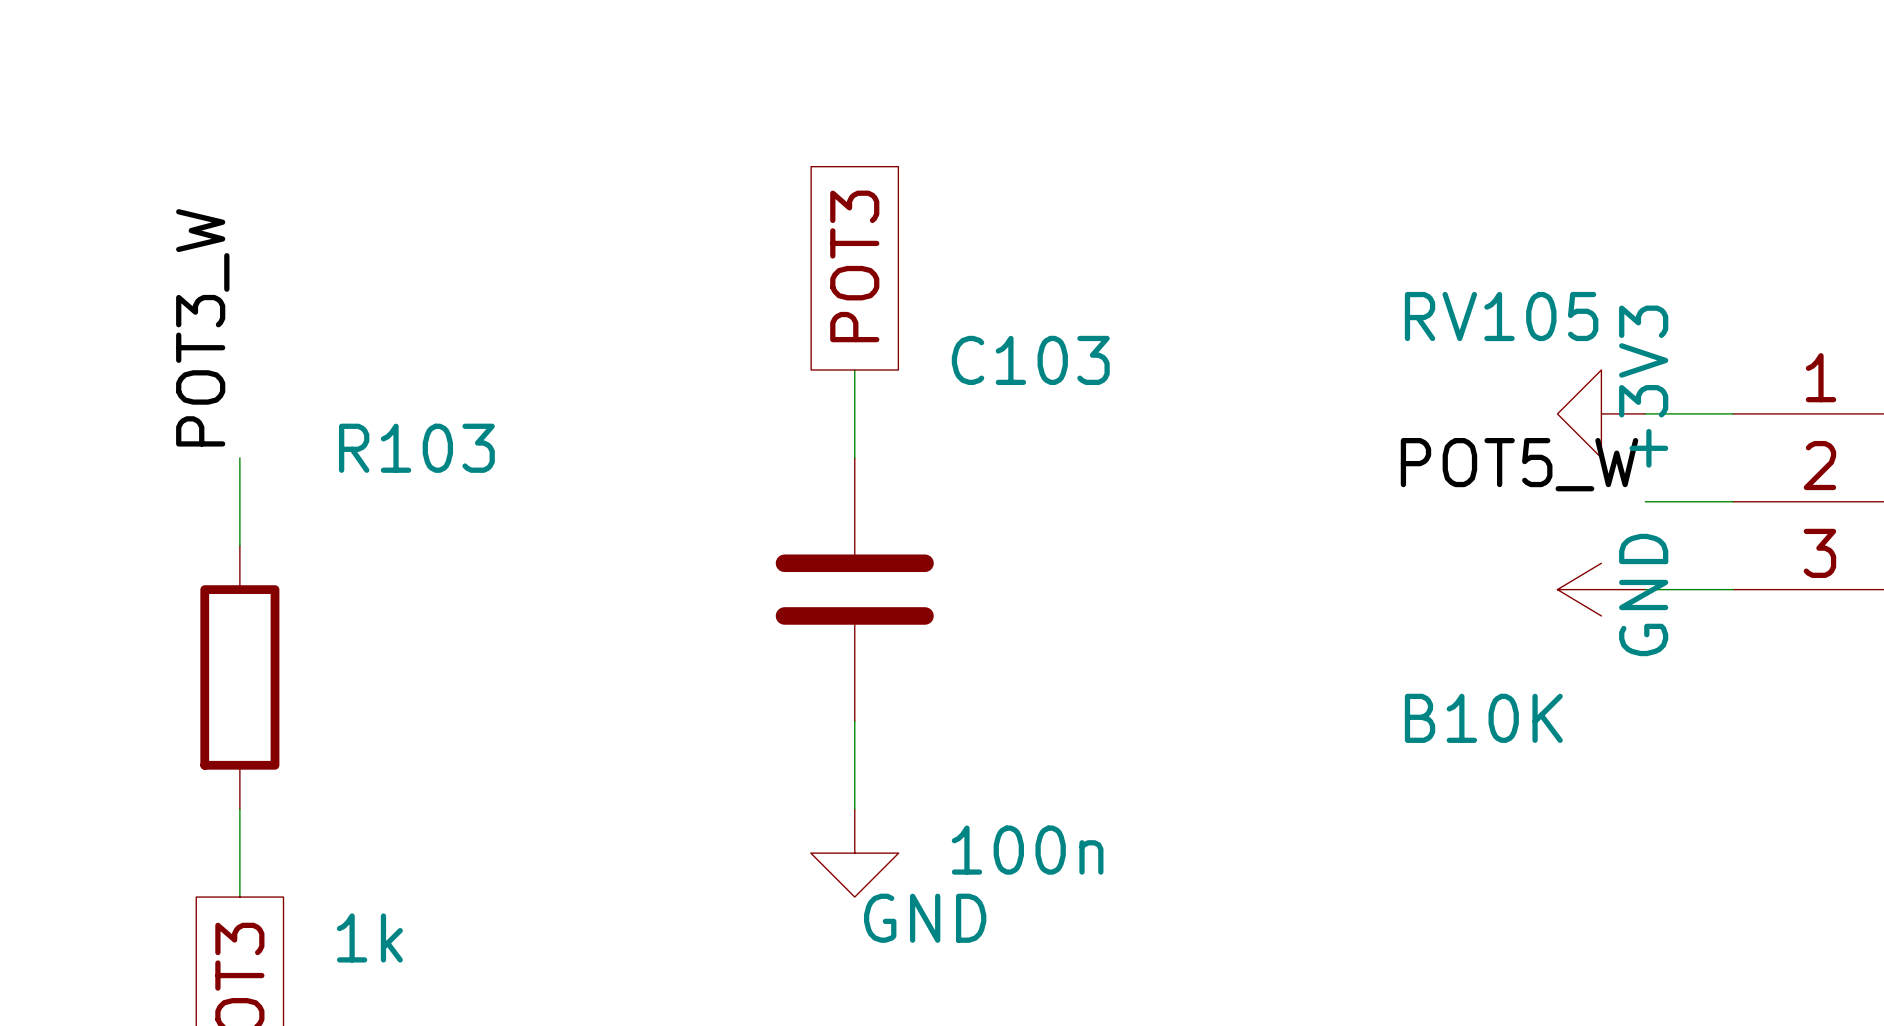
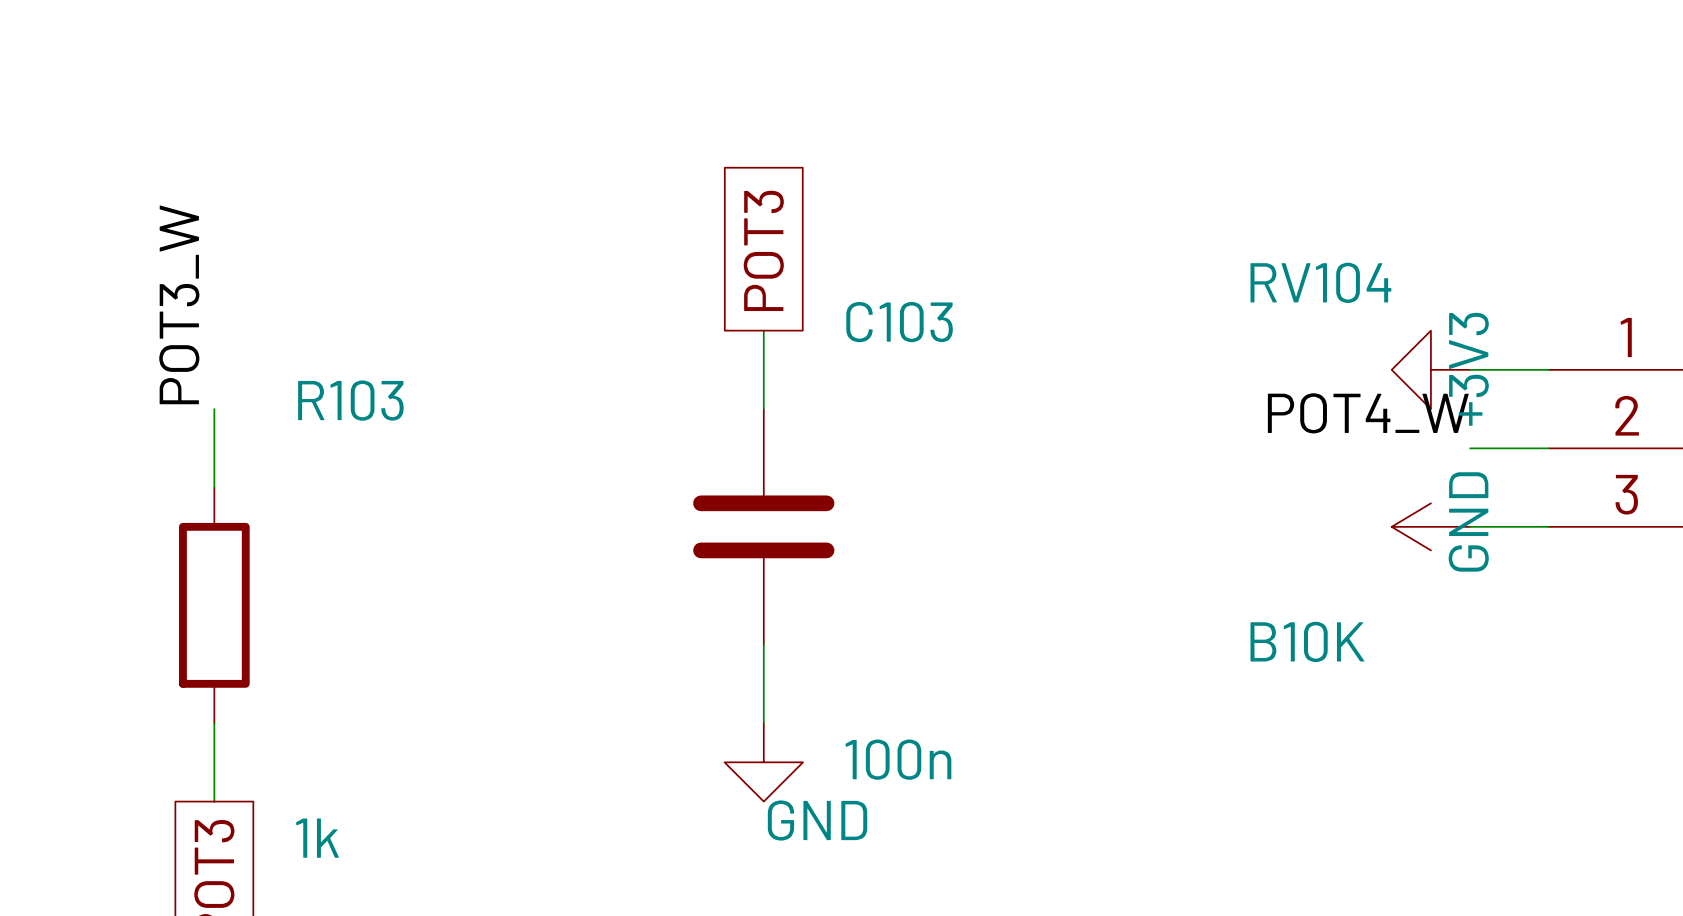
RV105 name: RV105 (1501, 316) -> RV104 (1320, 282)
label: POT5_W (1519, 464) -> POT4_W (1368, 413)

